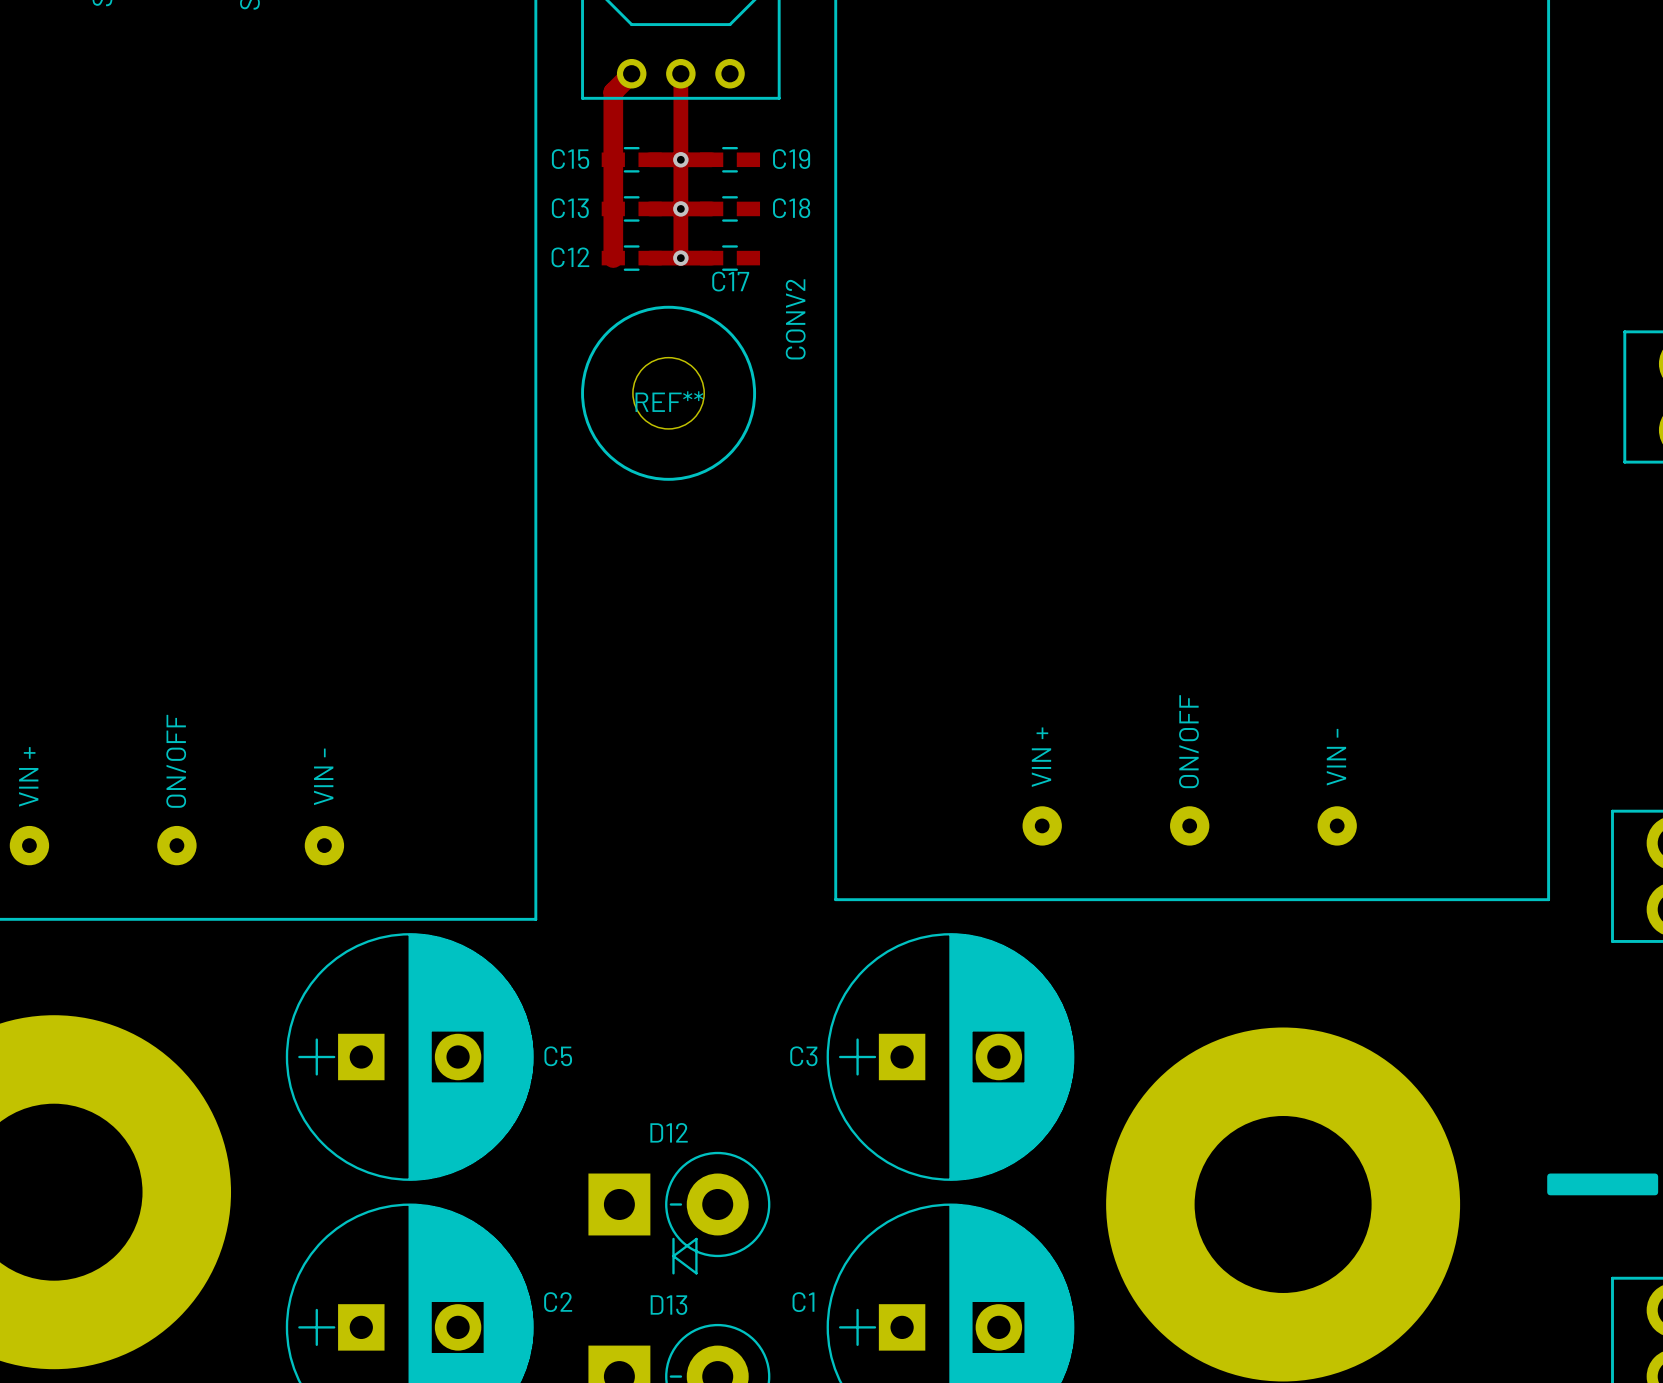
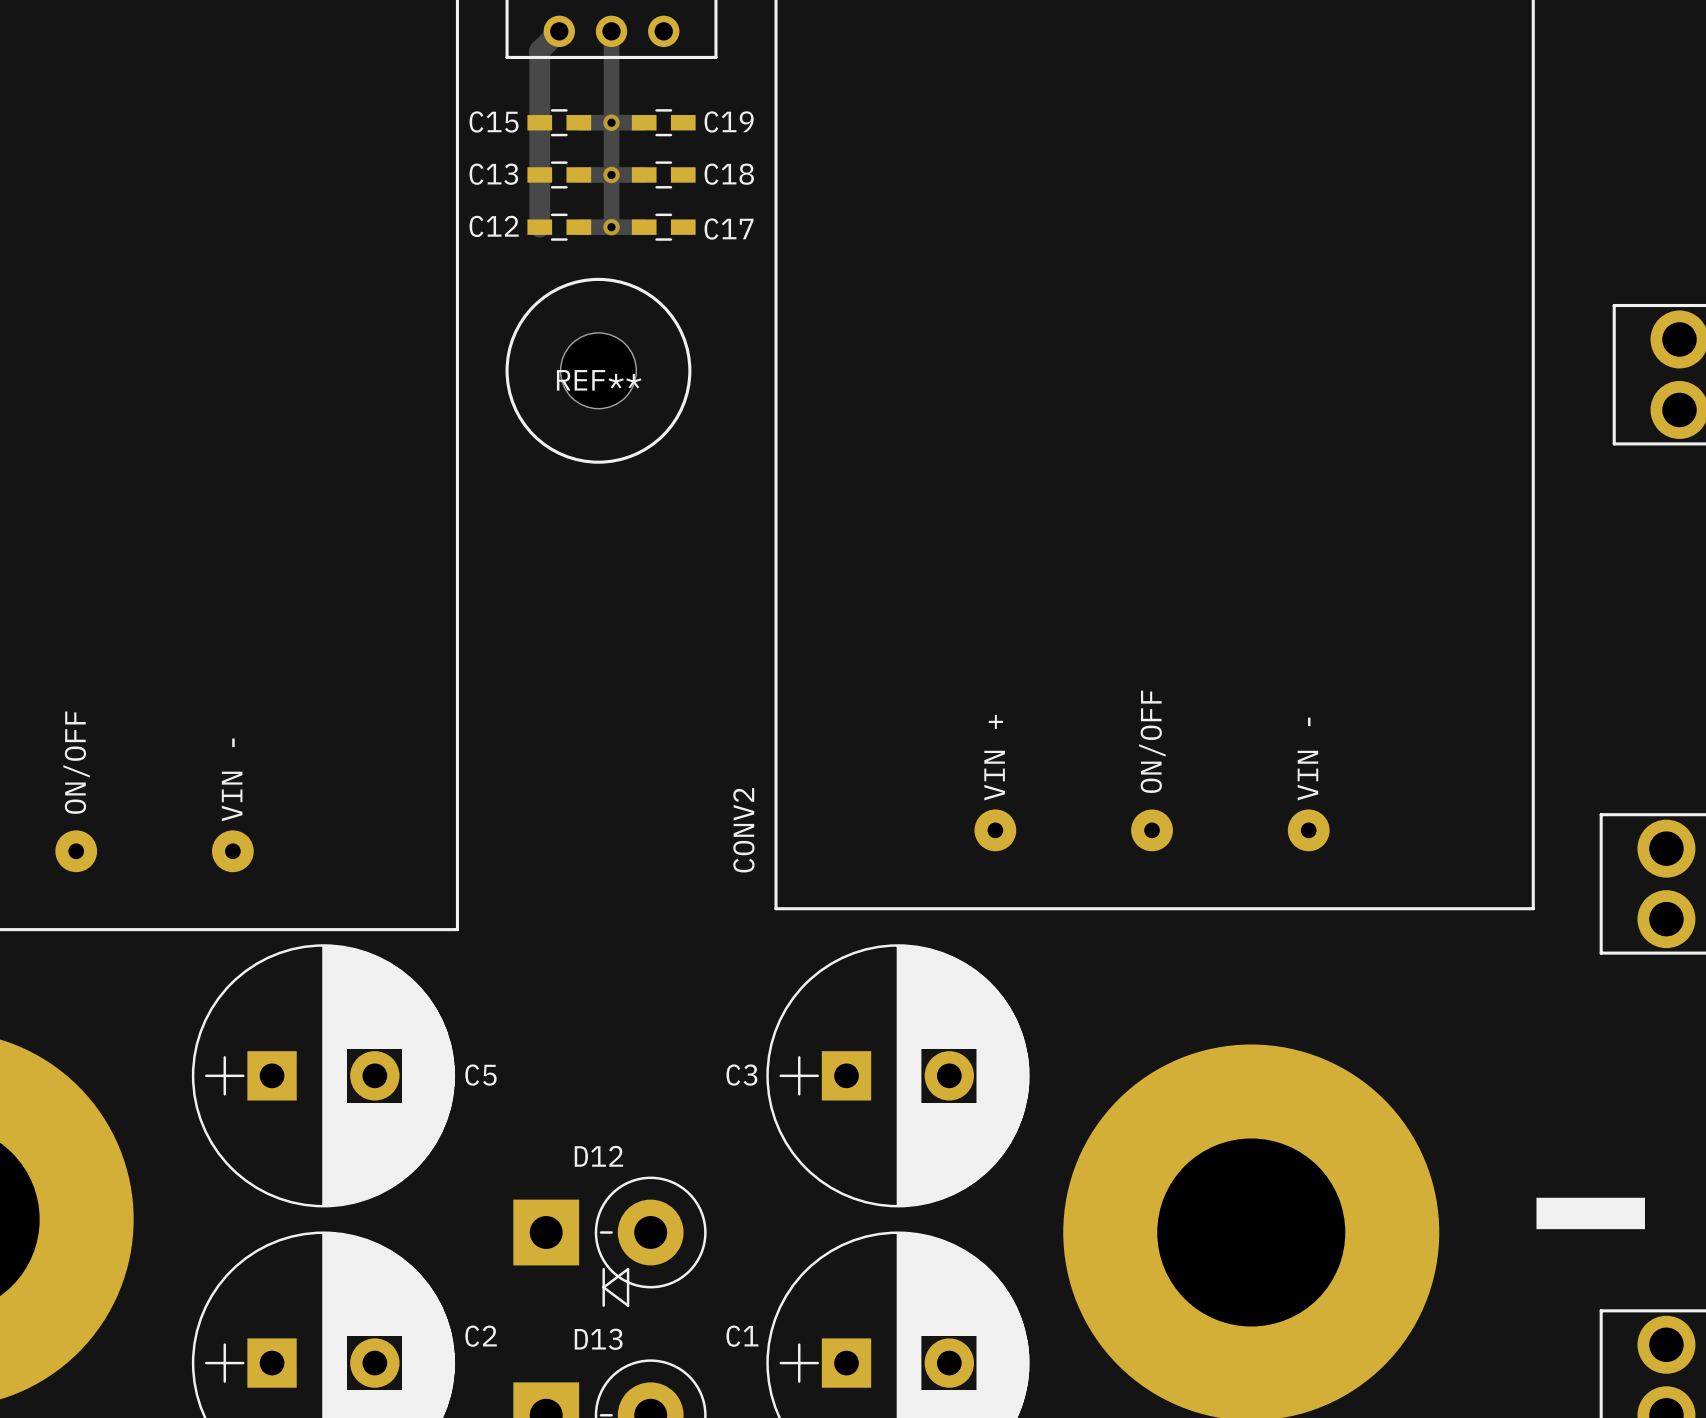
C17 name position: C17 (730, 281) -> C17 (729, 229)
CONV2 name position: CONV2 (795, 319) -> CONV2 (743, 830)

